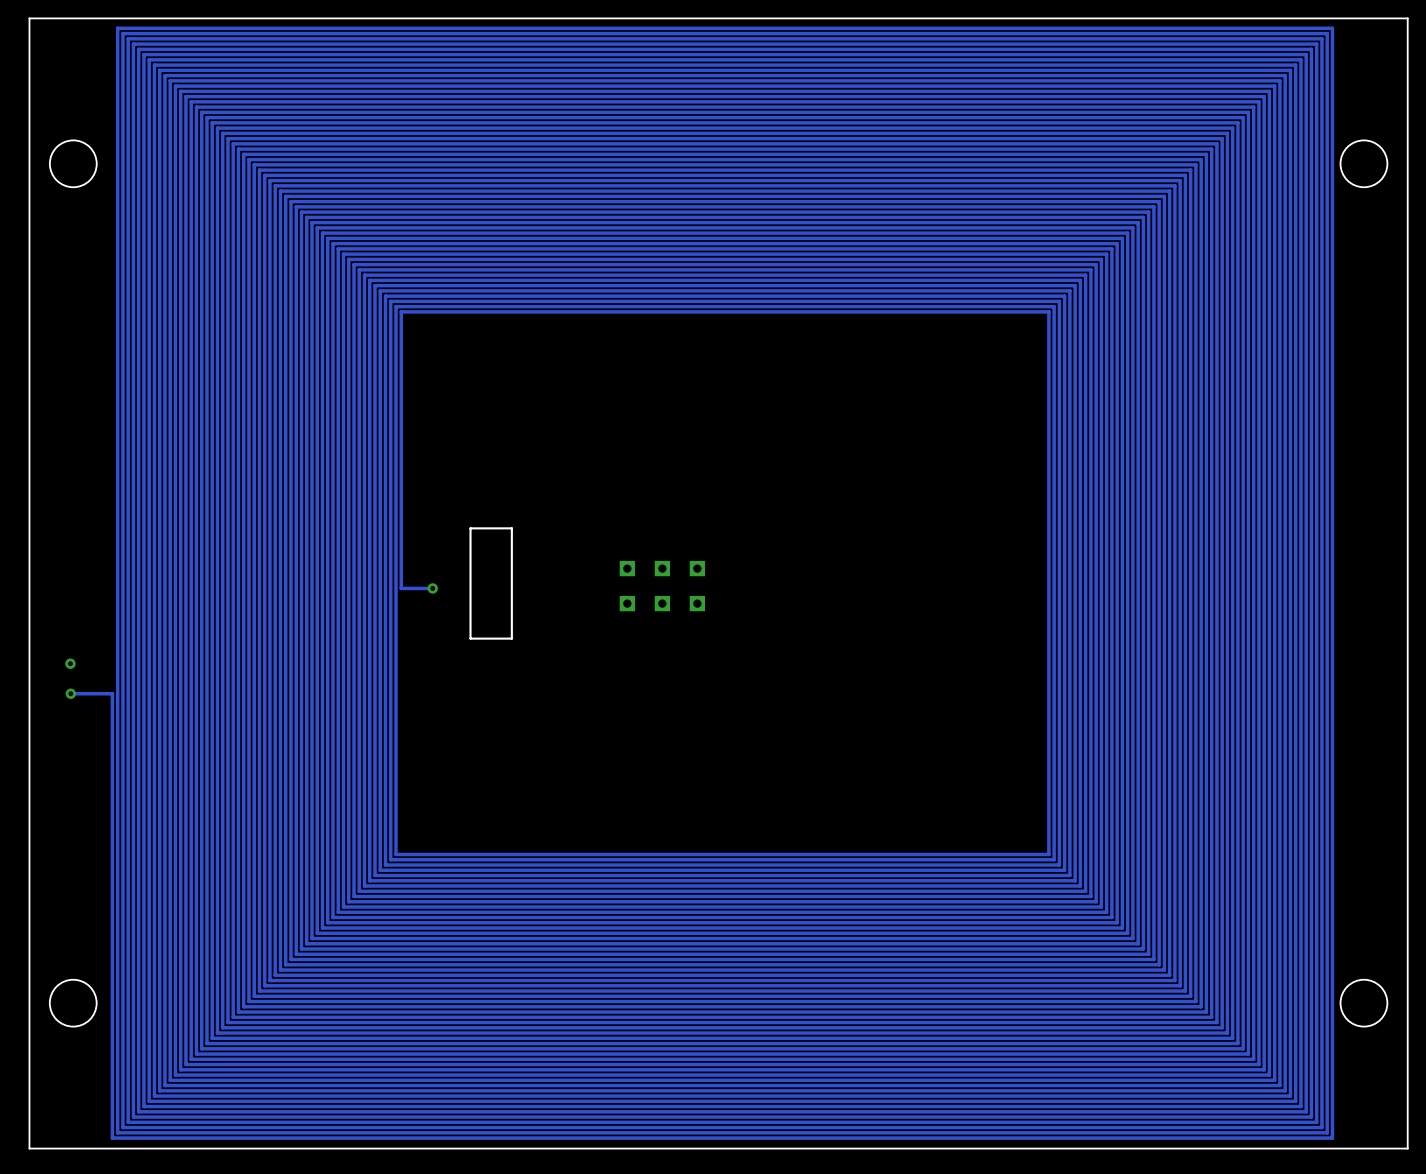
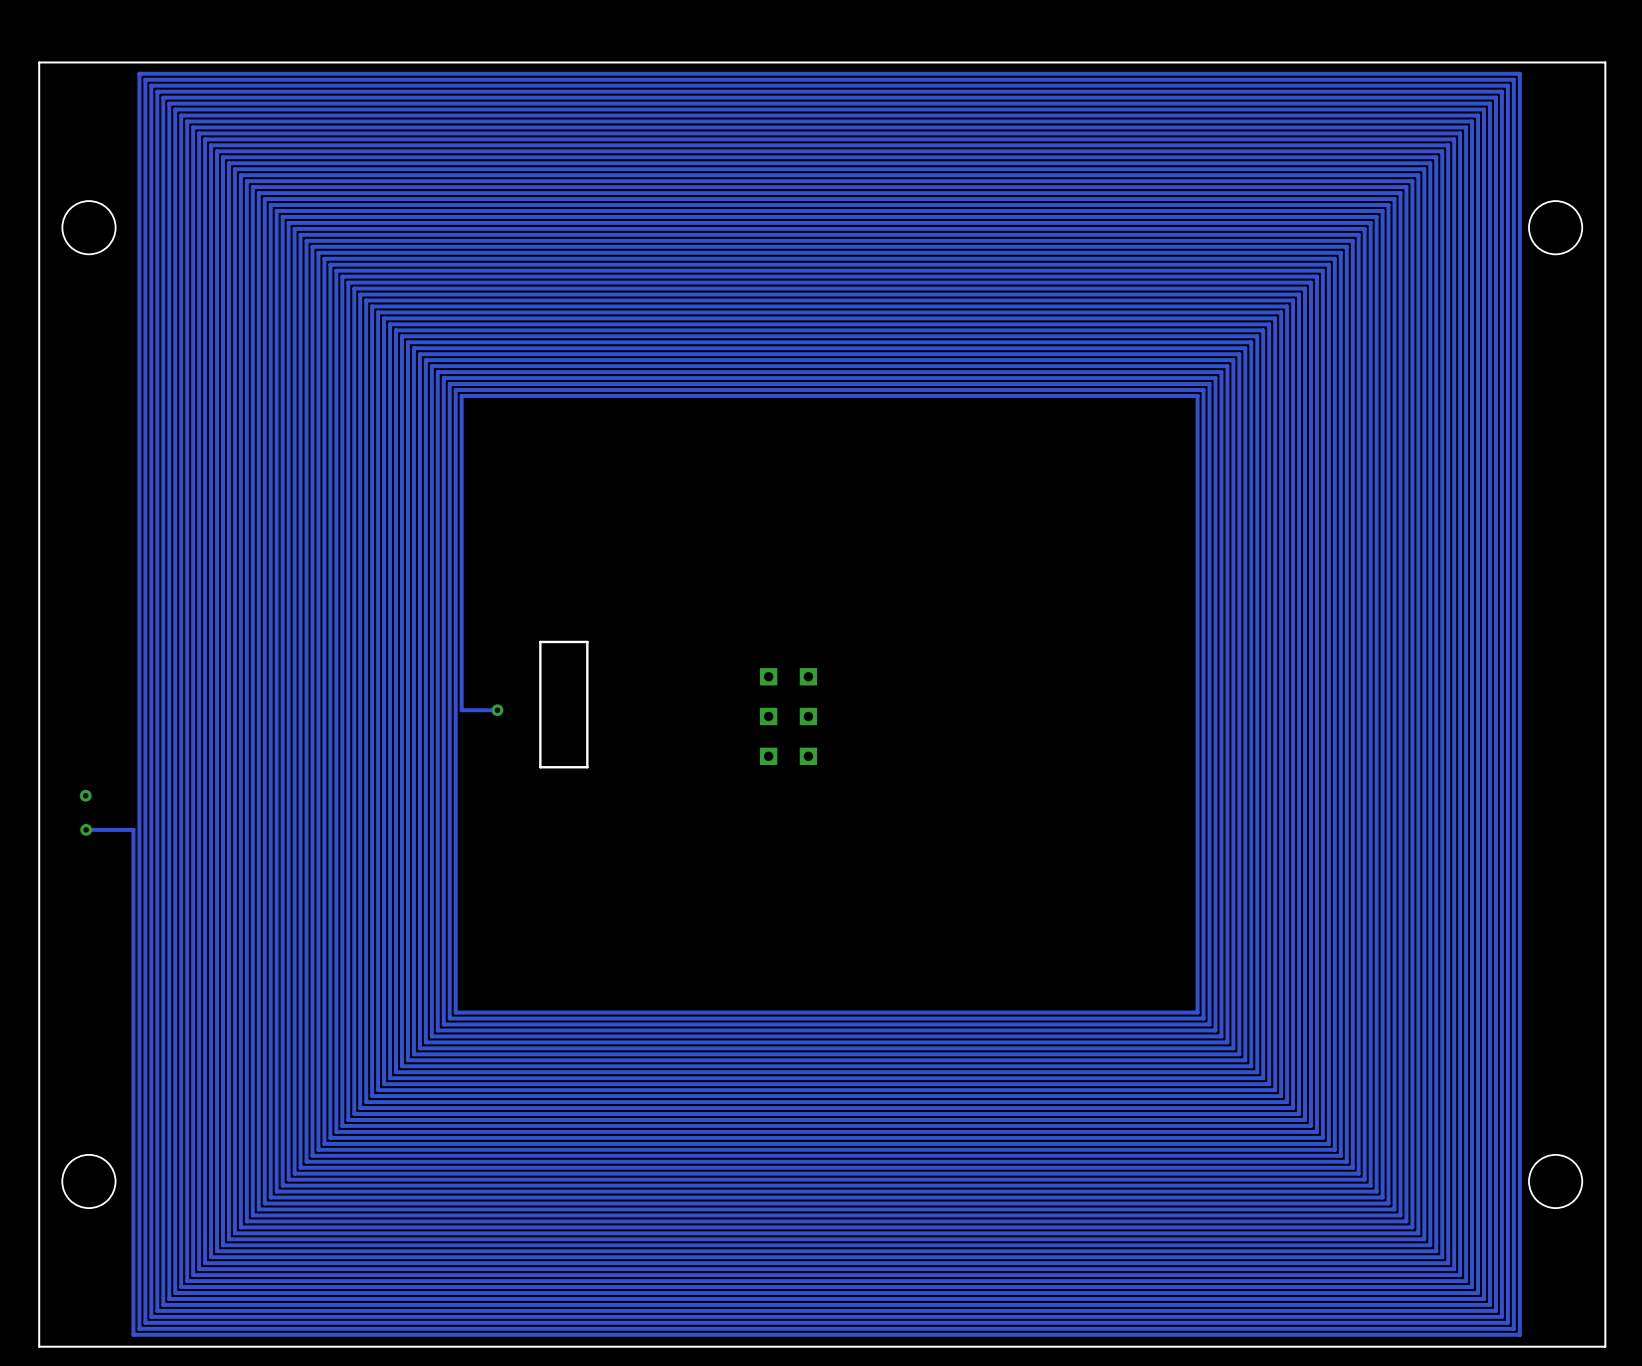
part rotation: 0° (662, 586) -> 90° clockwise (788, 716)

